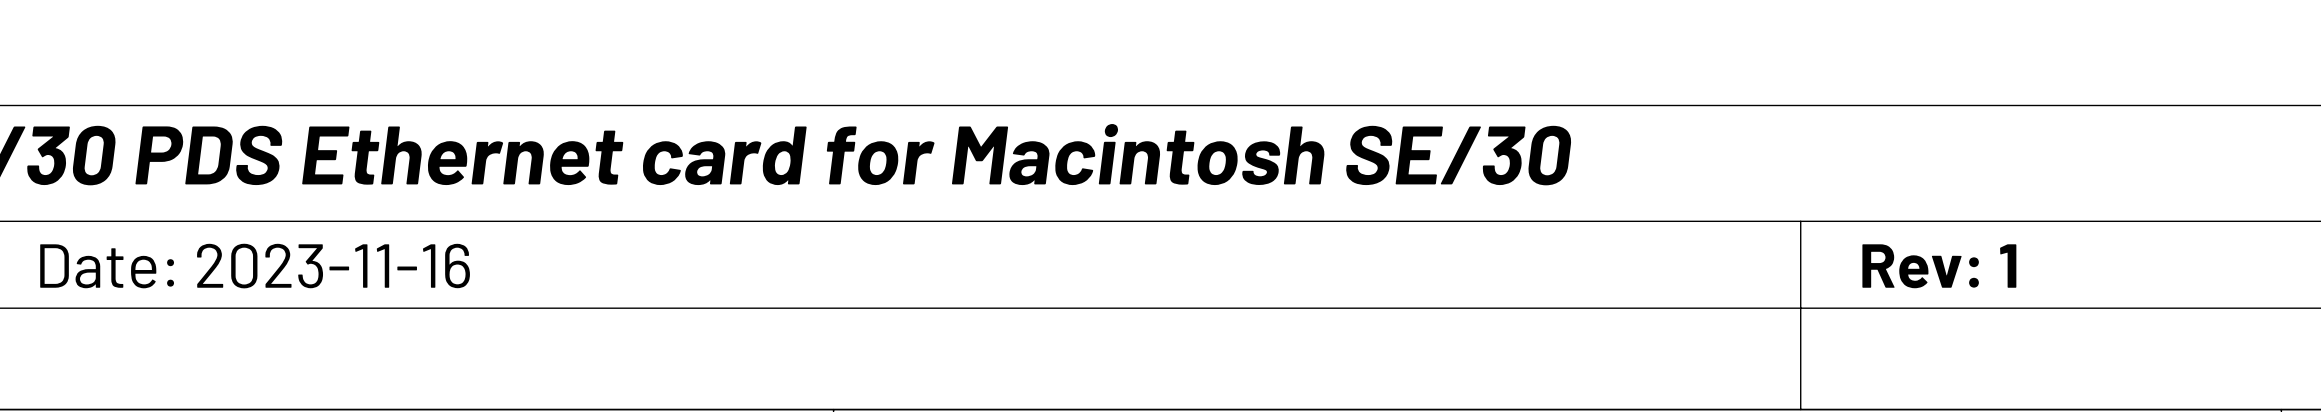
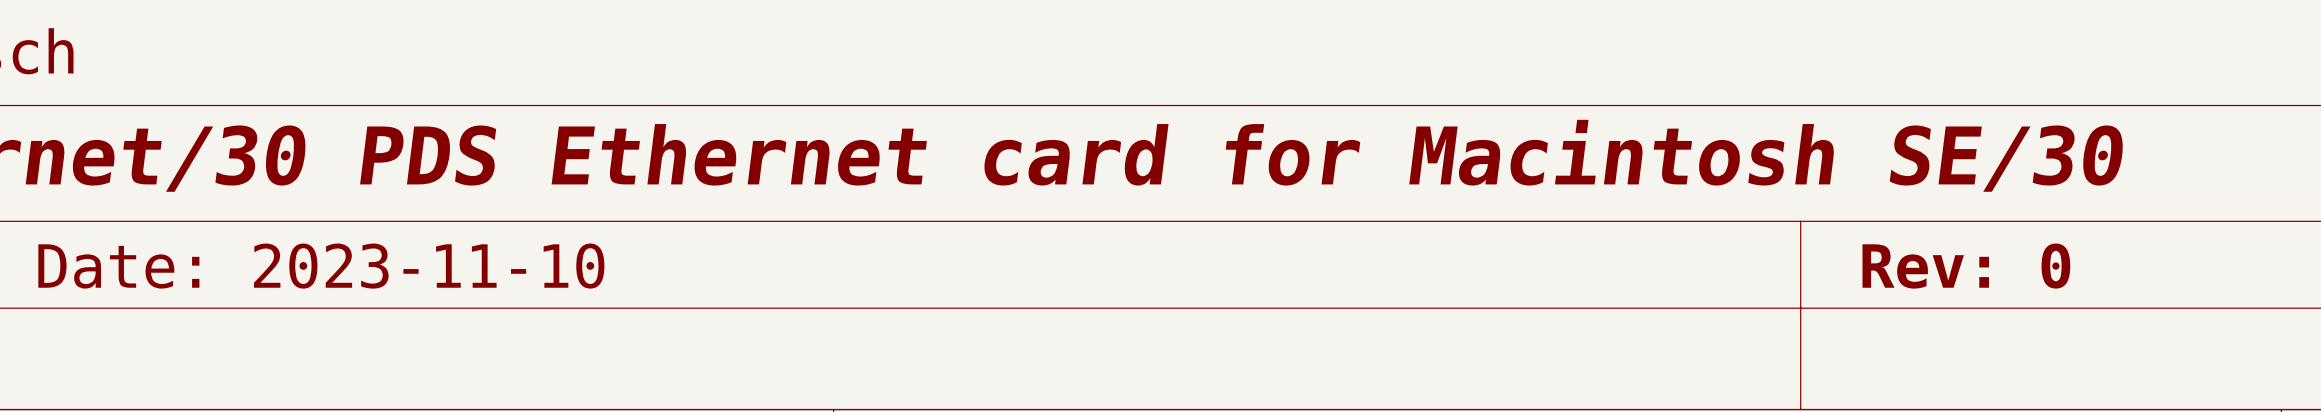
title block: Date: 2023-11-16 (255, 266) -> Date: 2023-11-10 (321, 266)
title block: Rev: 1 (1939, 266) -> Rev: 0 (1966, 266)

